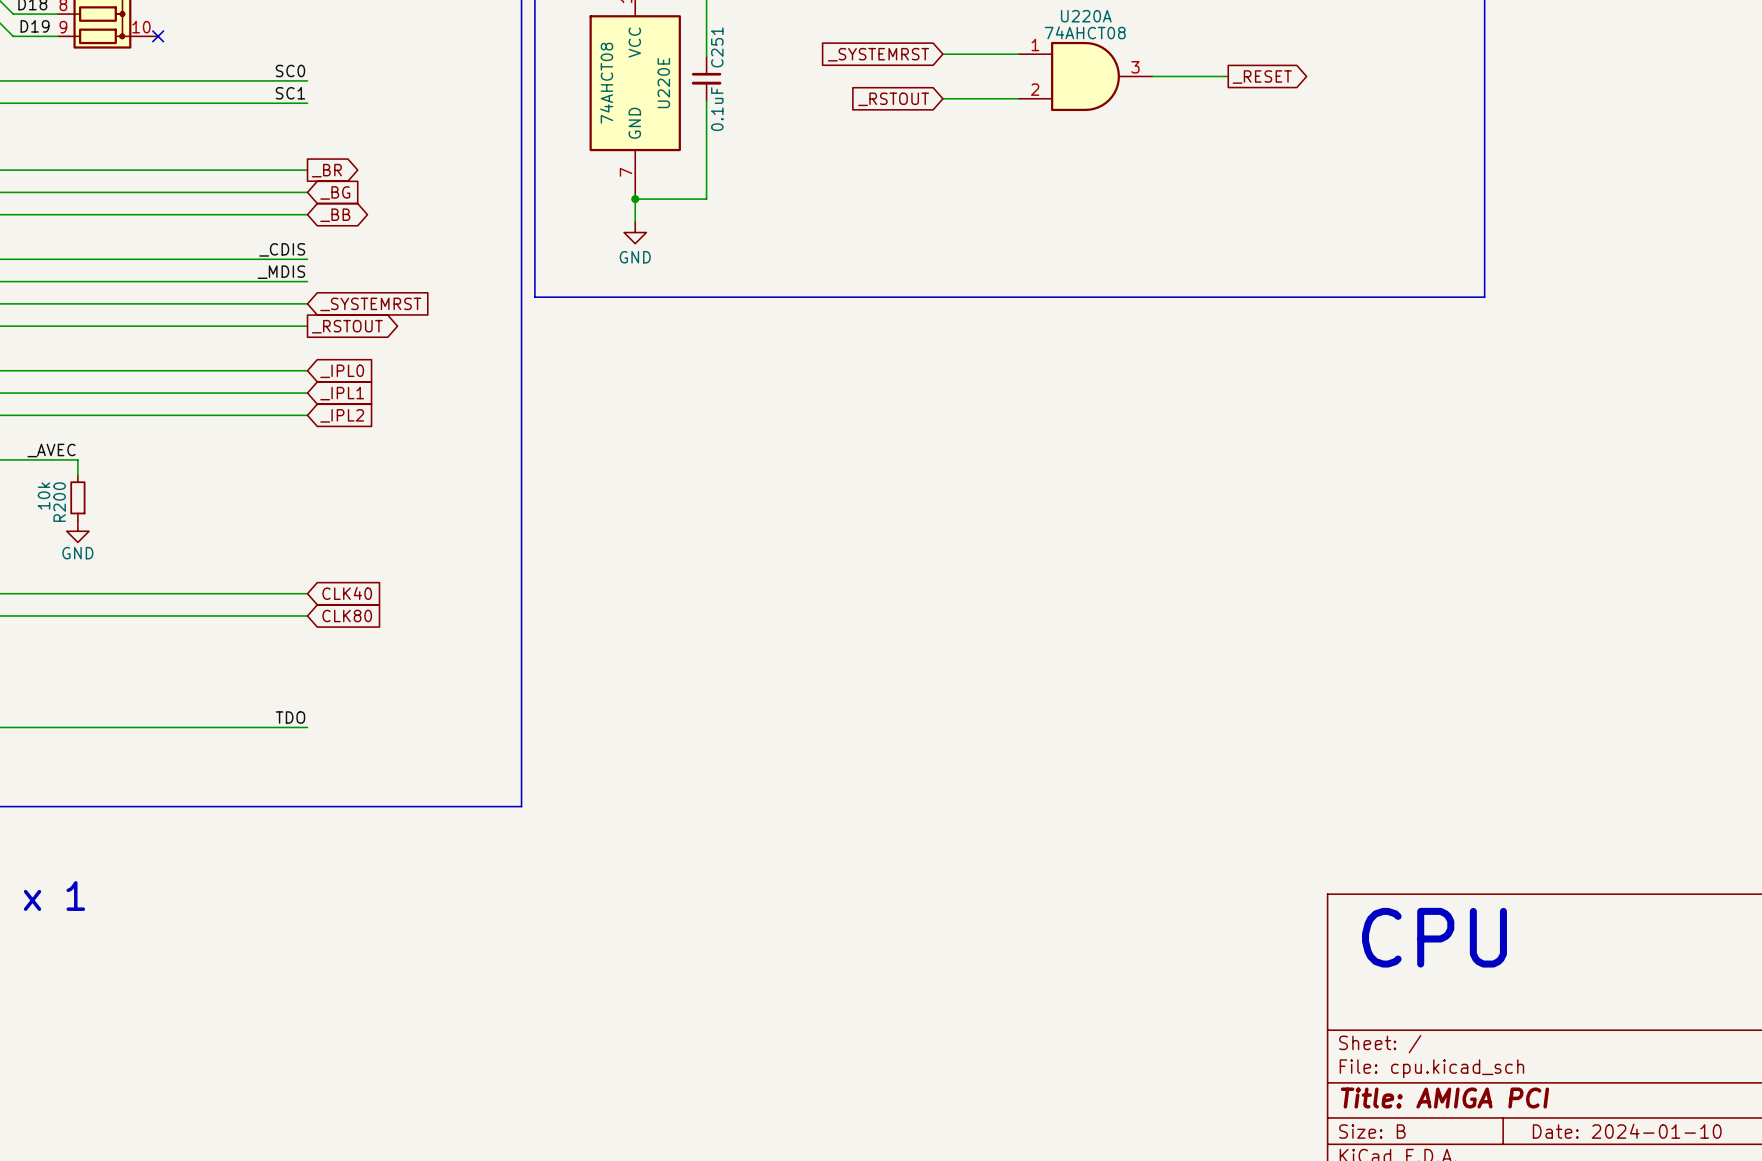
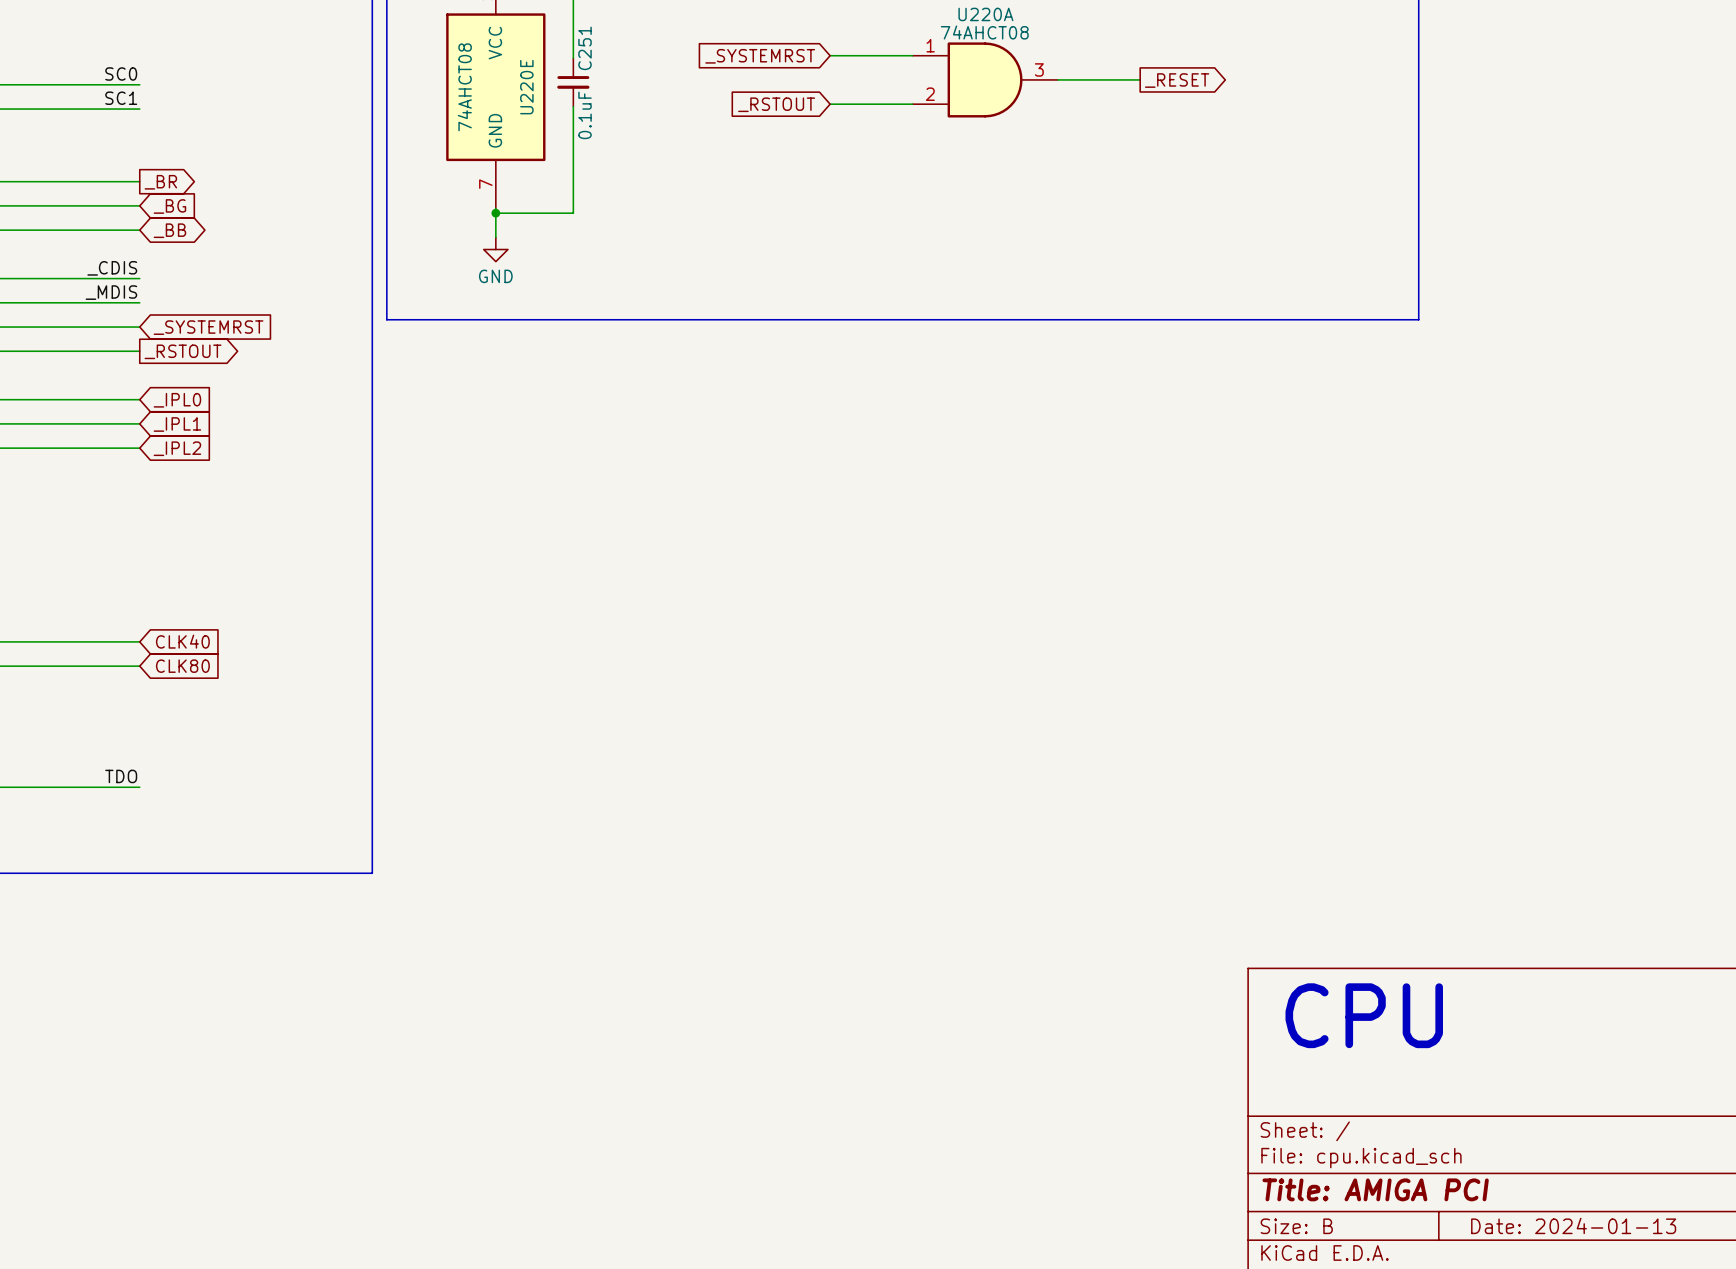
title block: Date: 2024-01-10 (1627, 1131) -> Date: 2024-01-13 (1573, 1225)

